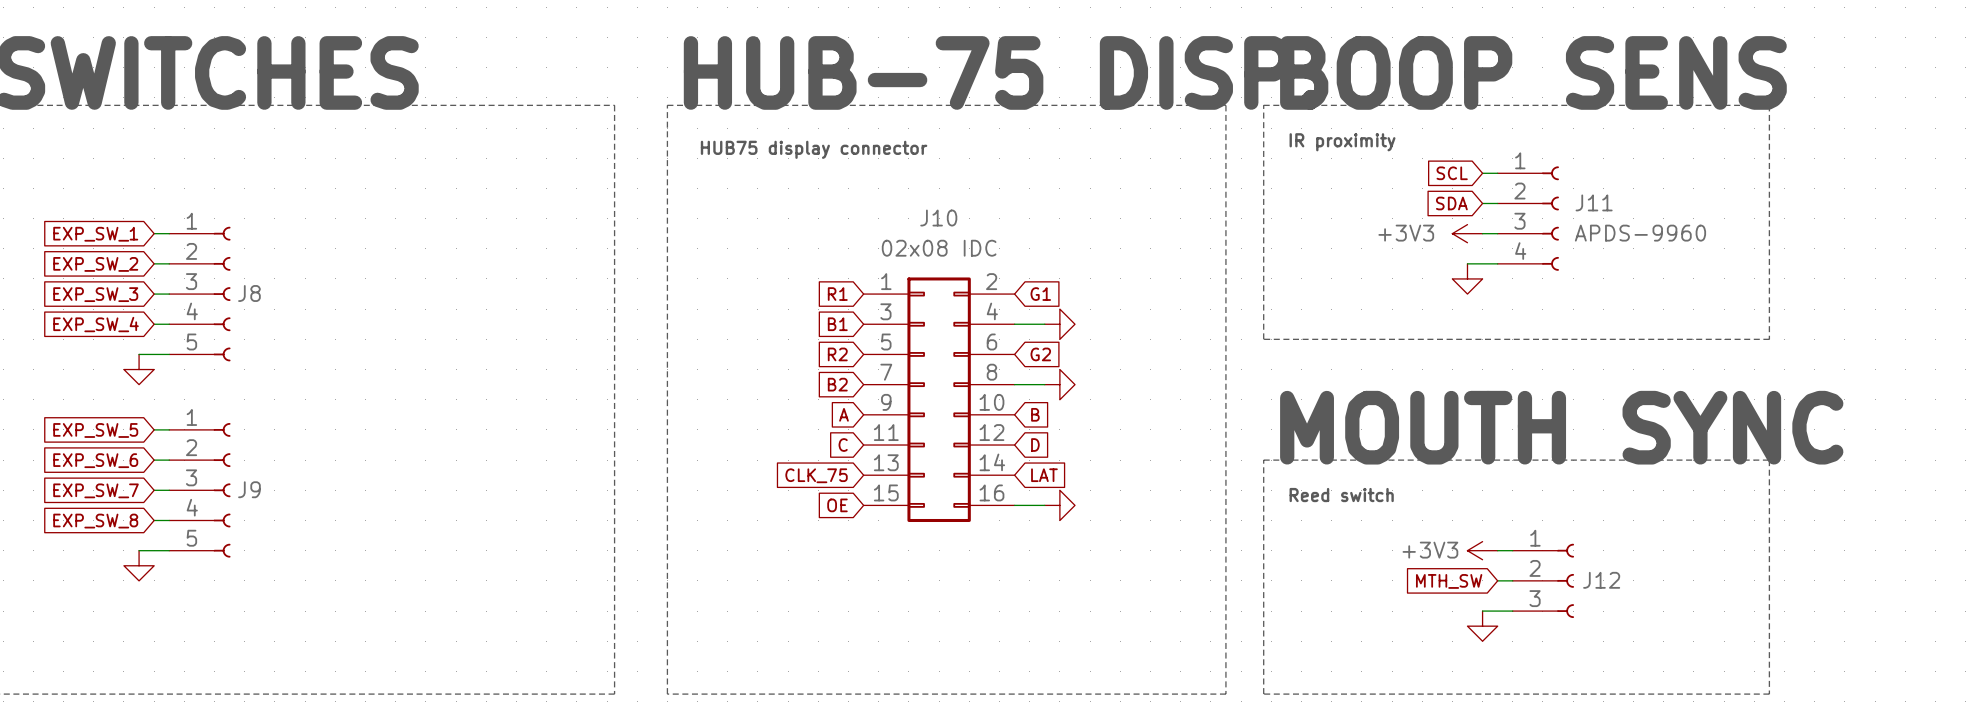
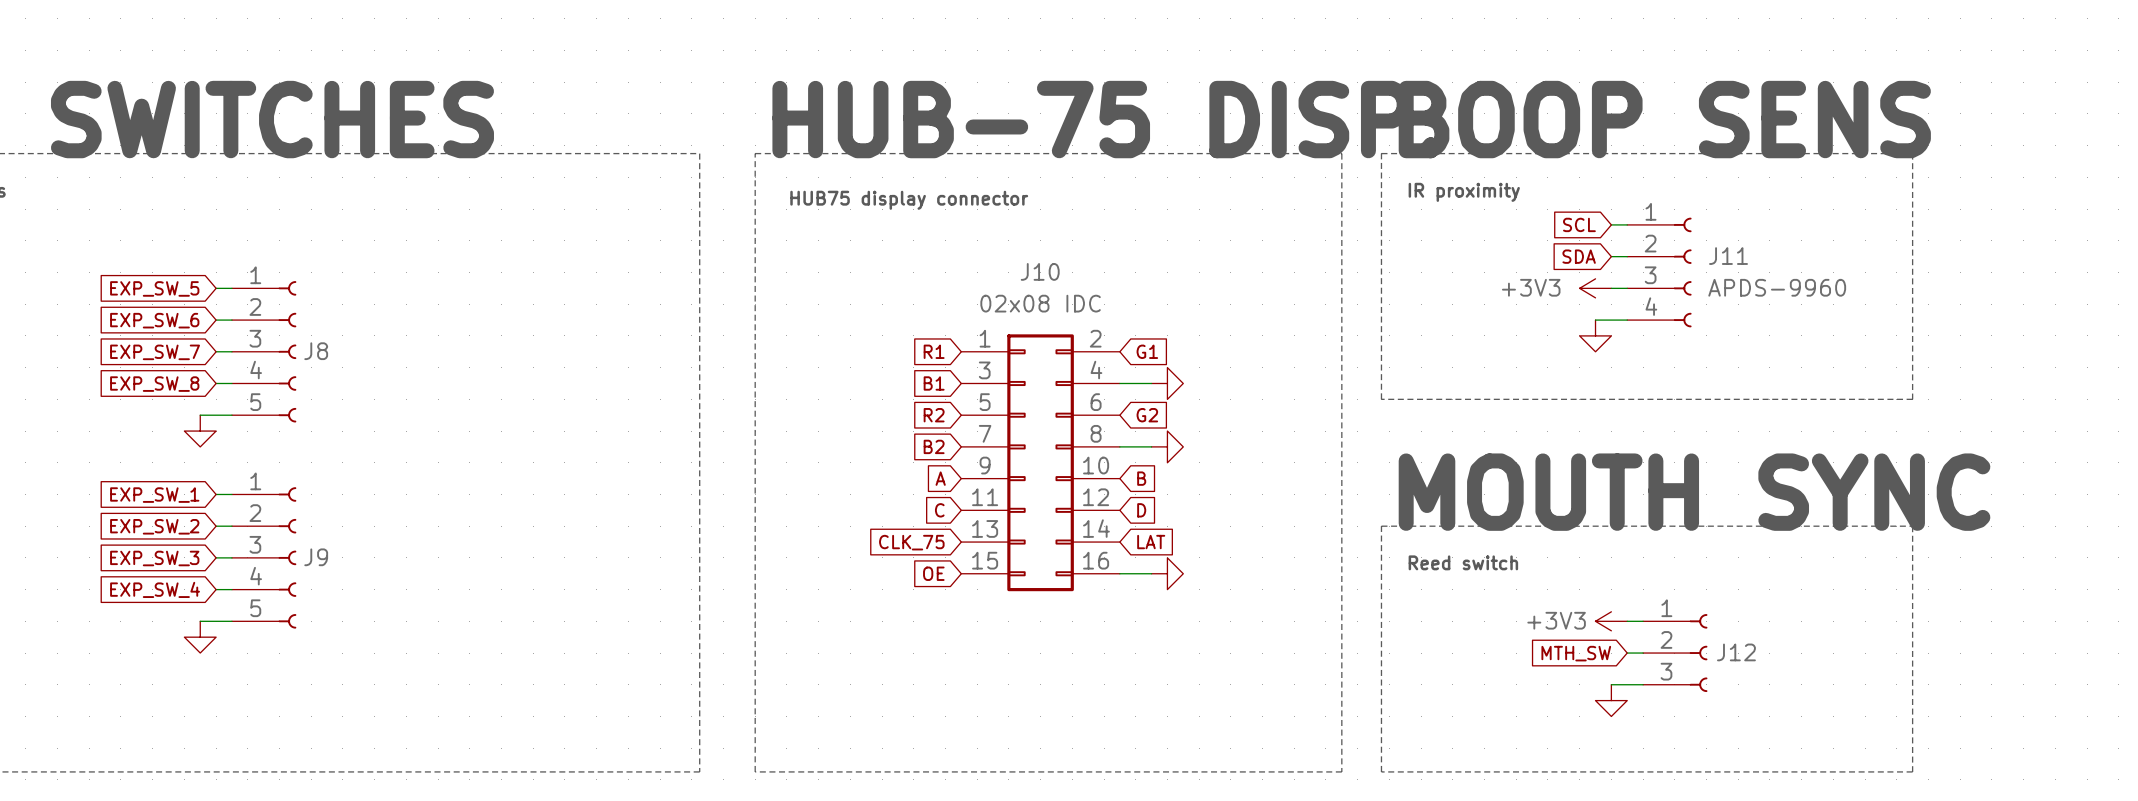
global label: EXP_SW_1 (95, 234) -> EXP_SW_5 (154, 288)
global label: EXP_SW_2 (95, 264) -> EXP_SW_6 (154, 320)
global label: EXP_SW_3 (95, 294) -> EXP_SW_7 (155, 352)
global label: EXP_SW_4 (96, 324) -> EXP_SW_8 (154, 384)
global label: EXP_SW_5 (95, 430) -> EXP_SW_1 (154, 495)
global label: EXP_SW_6 (95, 460) -> EXP_SW_2 (154, 526)
global label: EXP_SW_7 (96, 490) -> EXP_SW_3 (154, 558)
global label: EXP_SW_8 (95, 521) -> EXP_SW_4 (155, 589)

